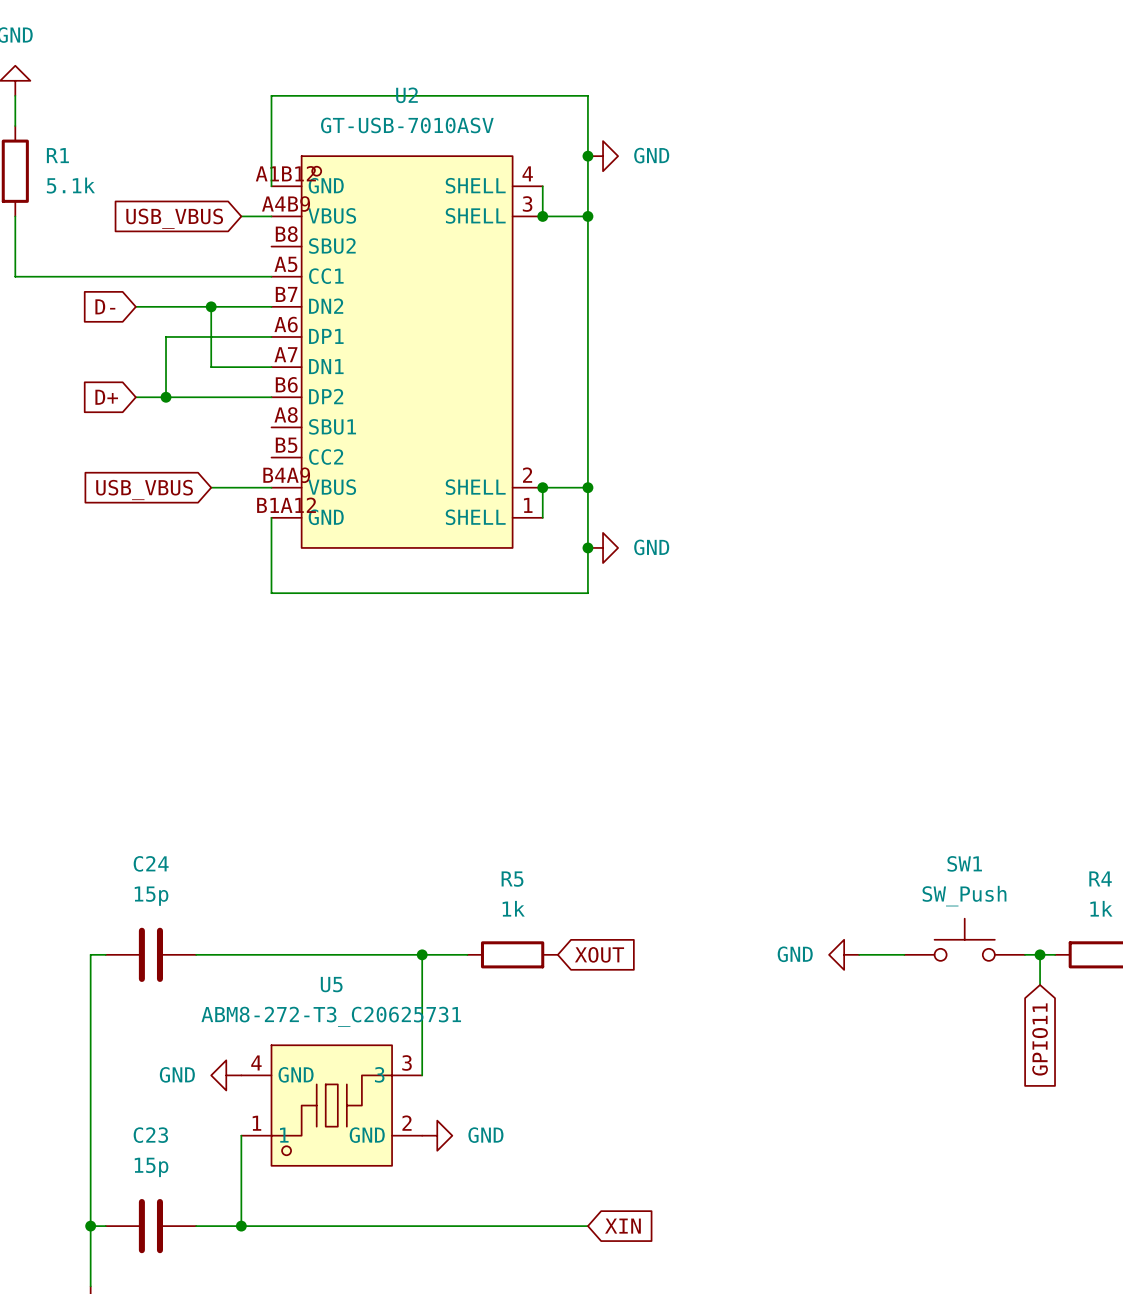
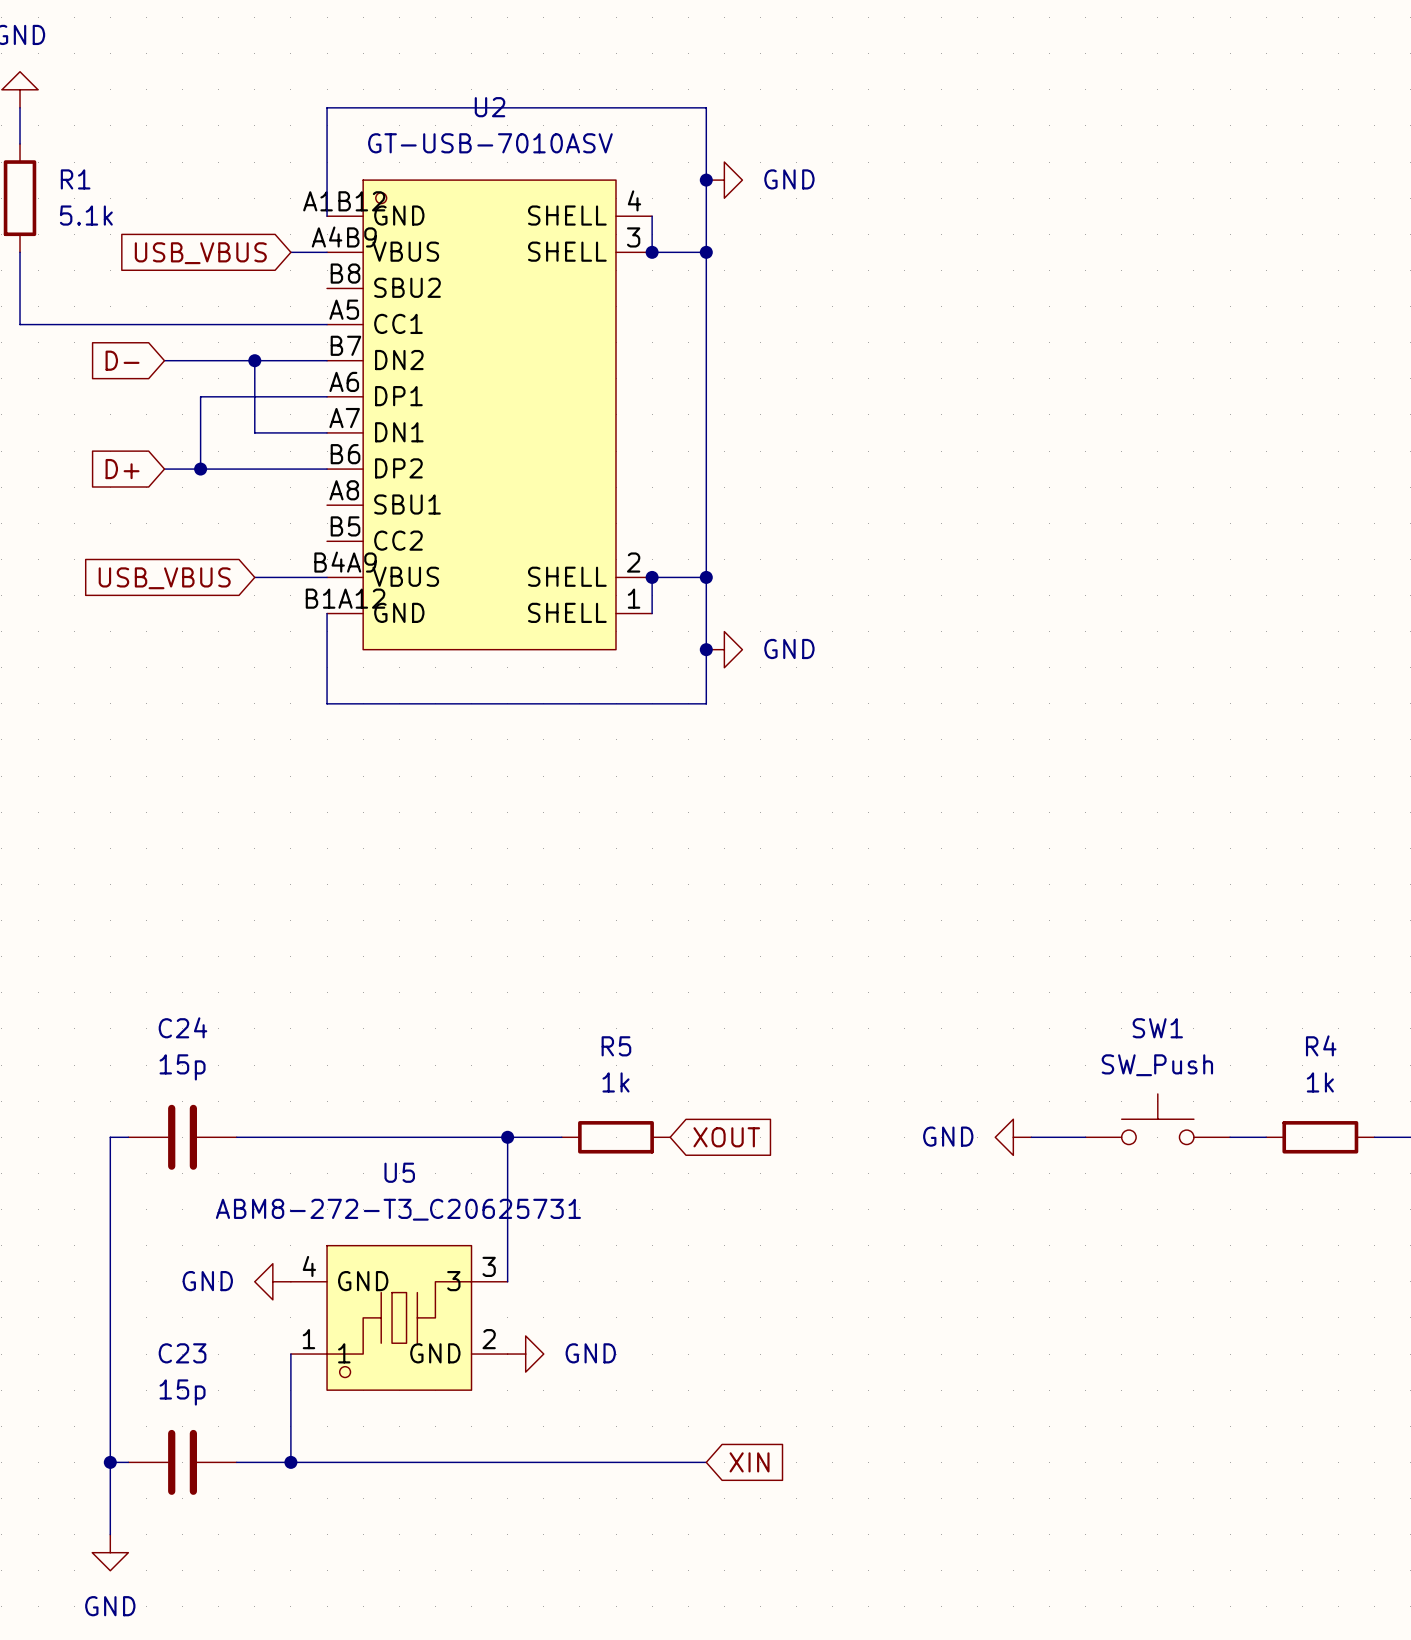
wire: (1040, 954) (1040, 984) -> none
junction: (1040, 954) -> none
global label: GPIO11 (1040, 1039) -> none

